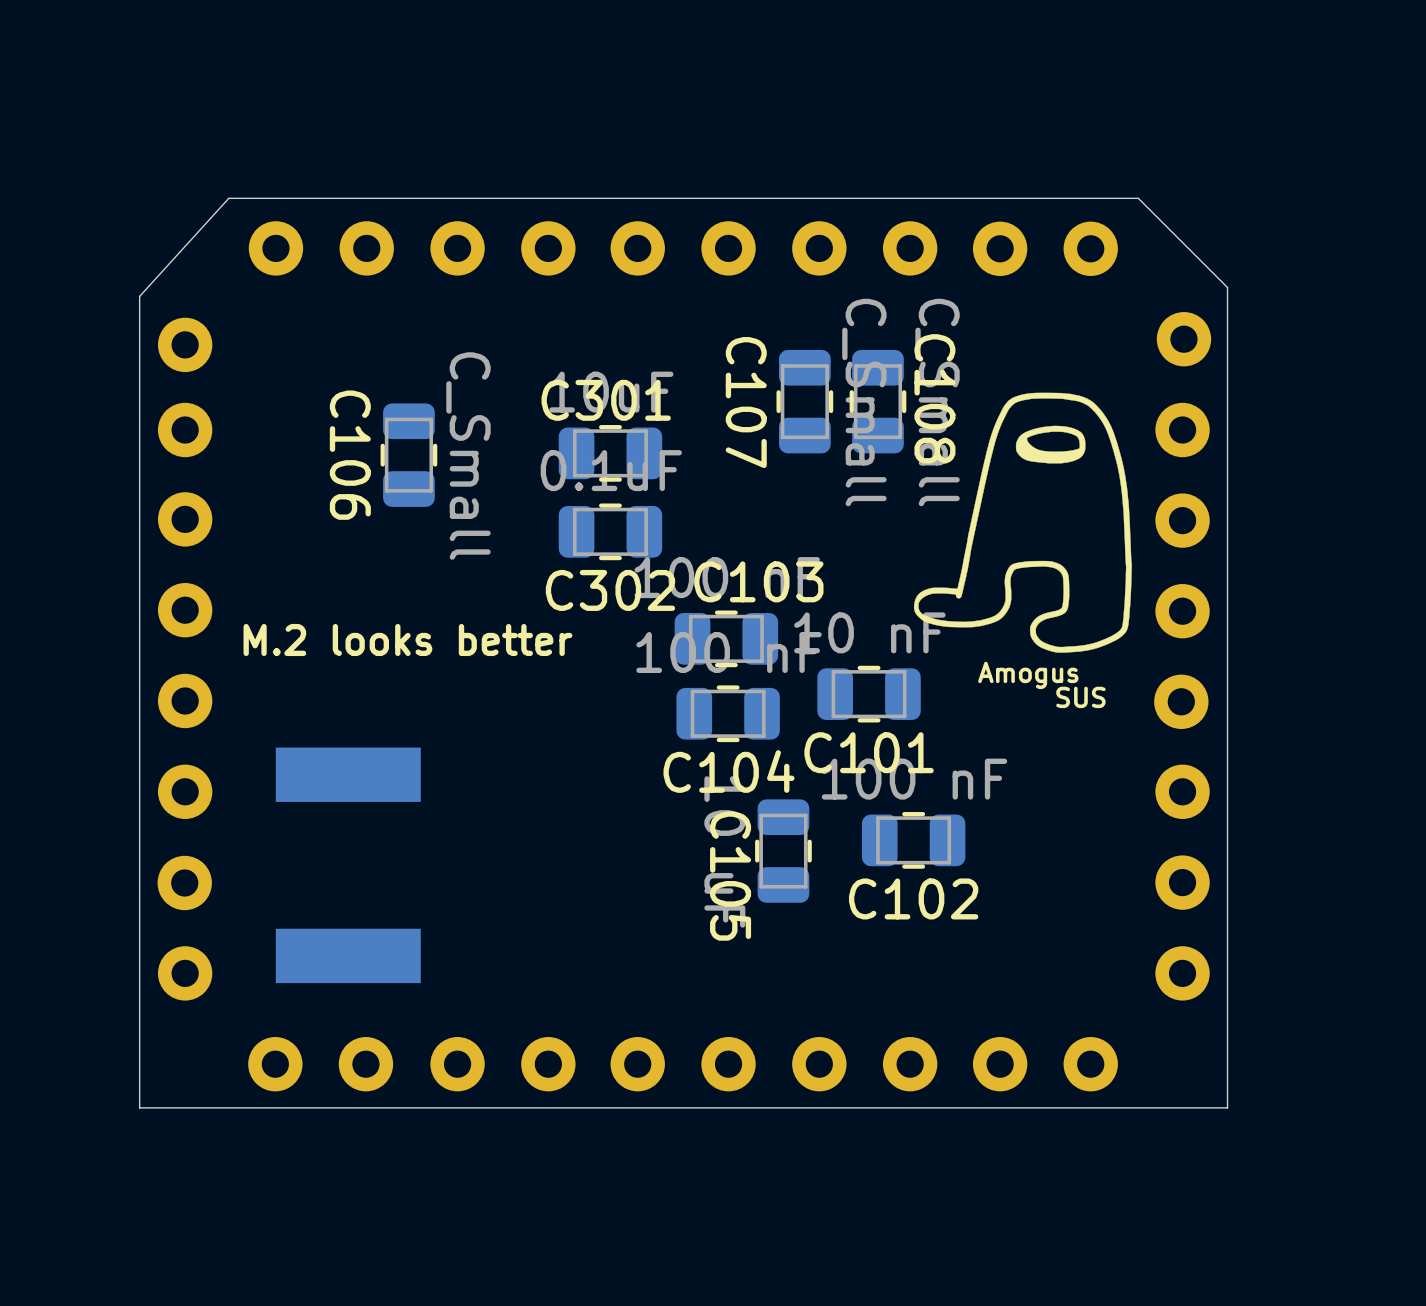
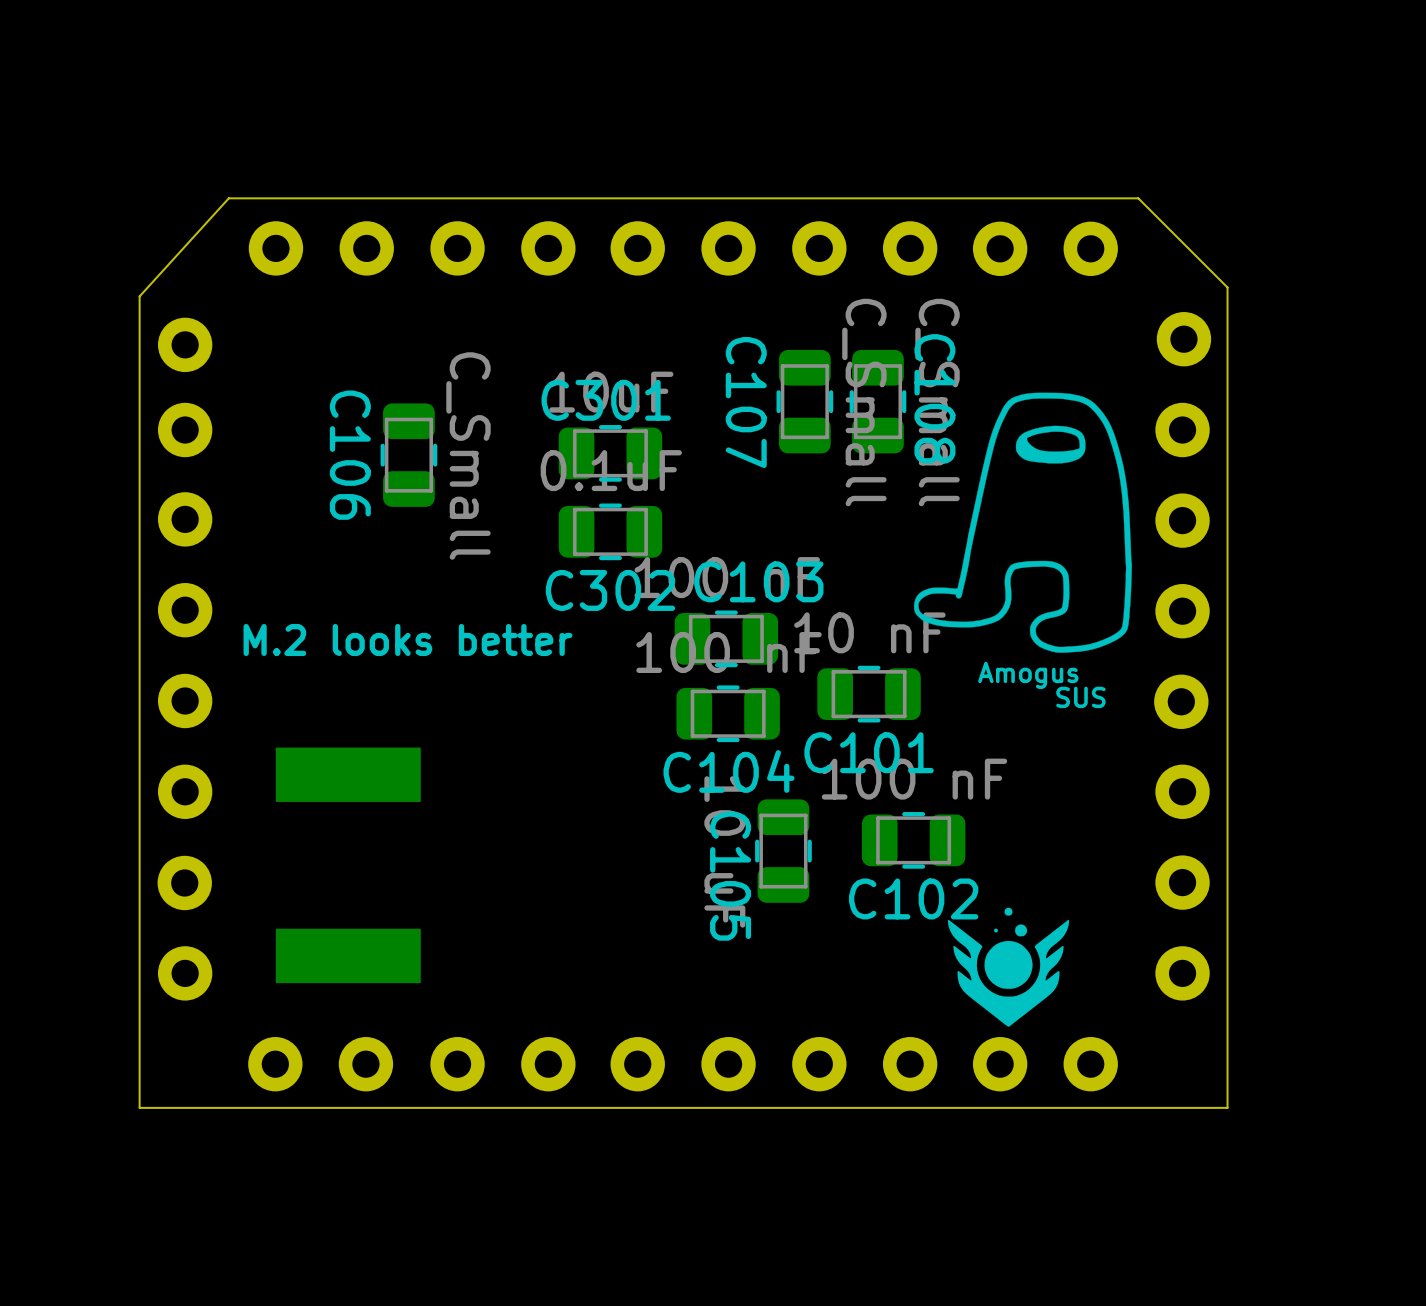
drawing: none -> [947, 907, 1070, 1027]

